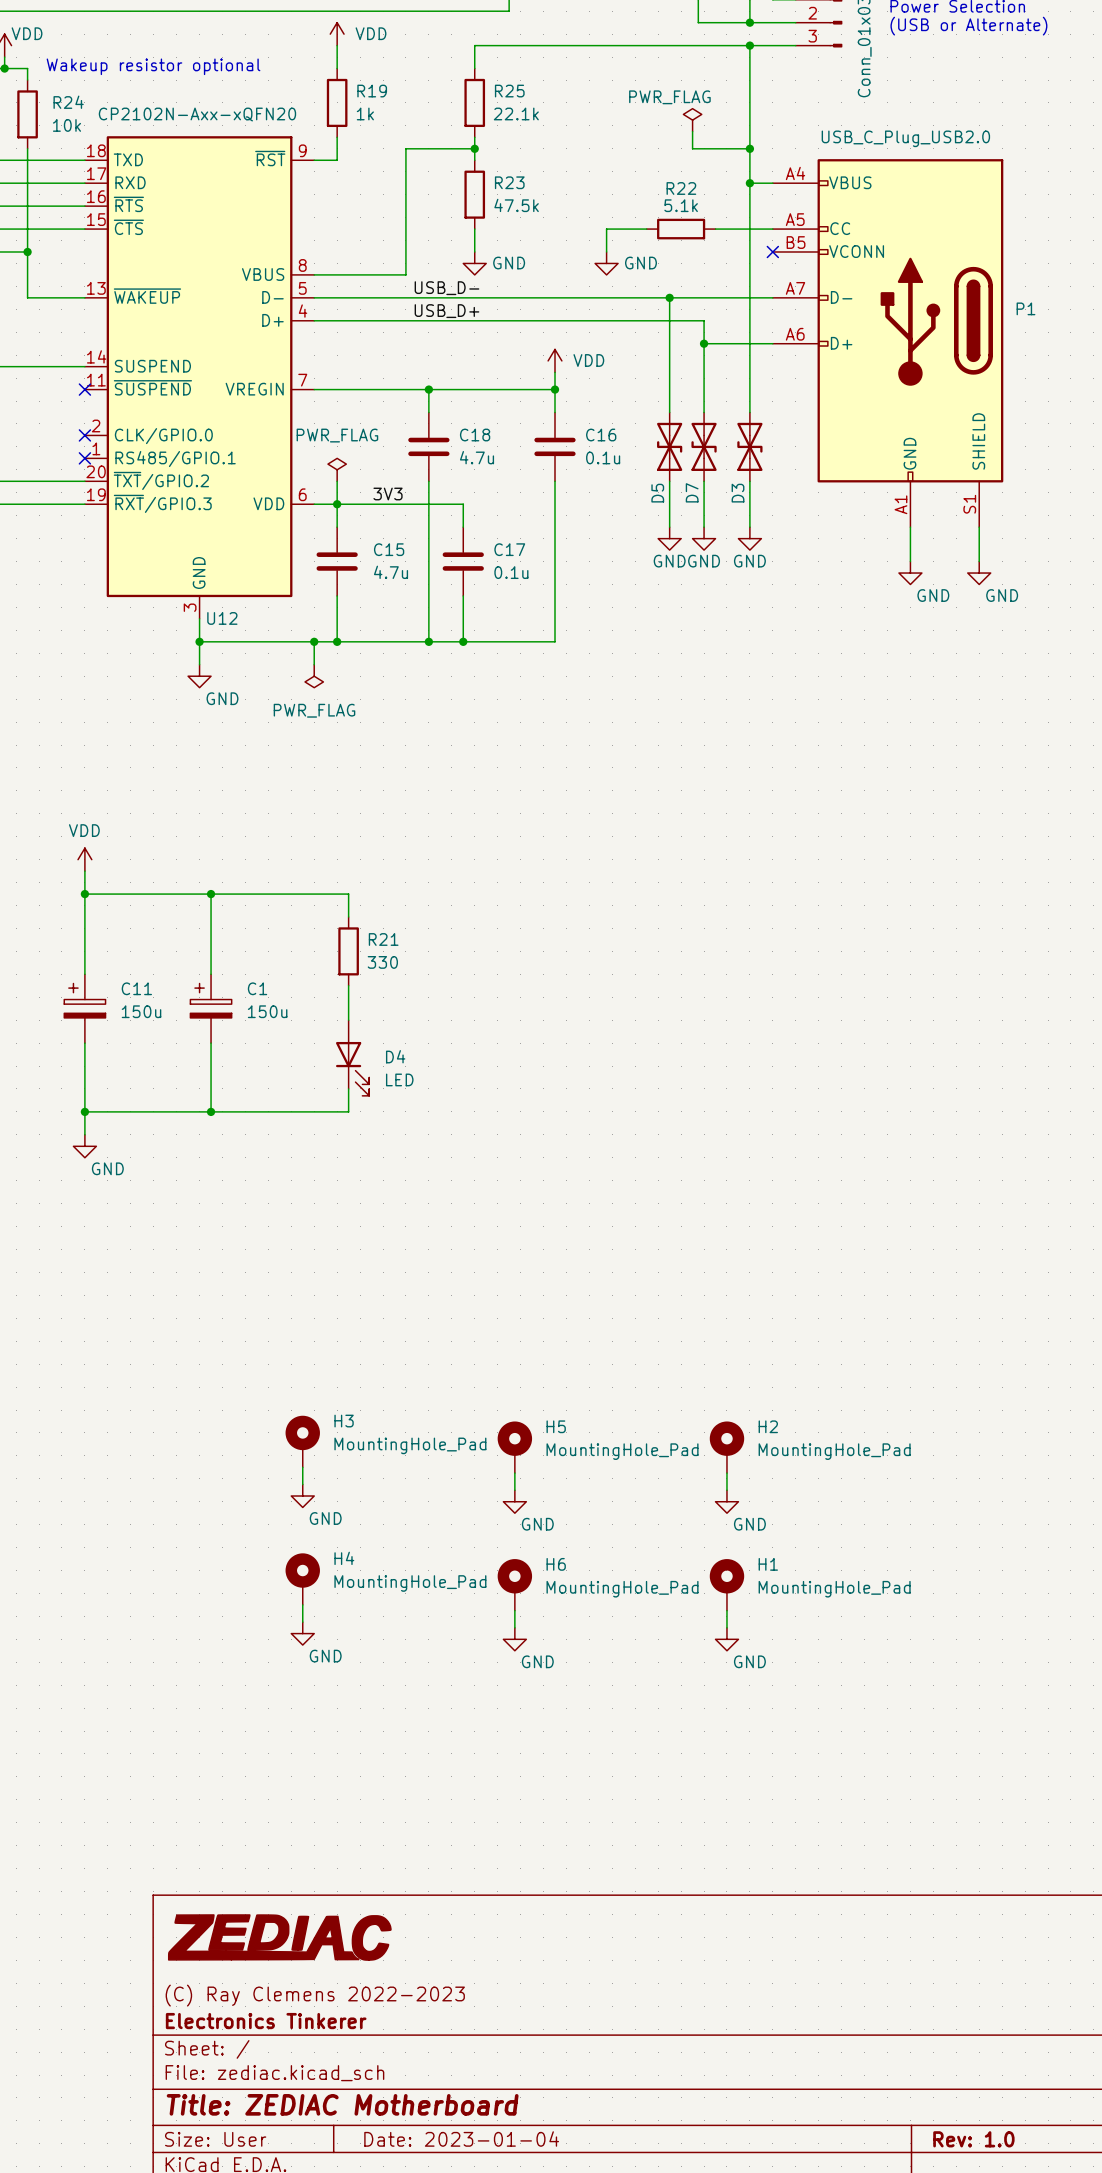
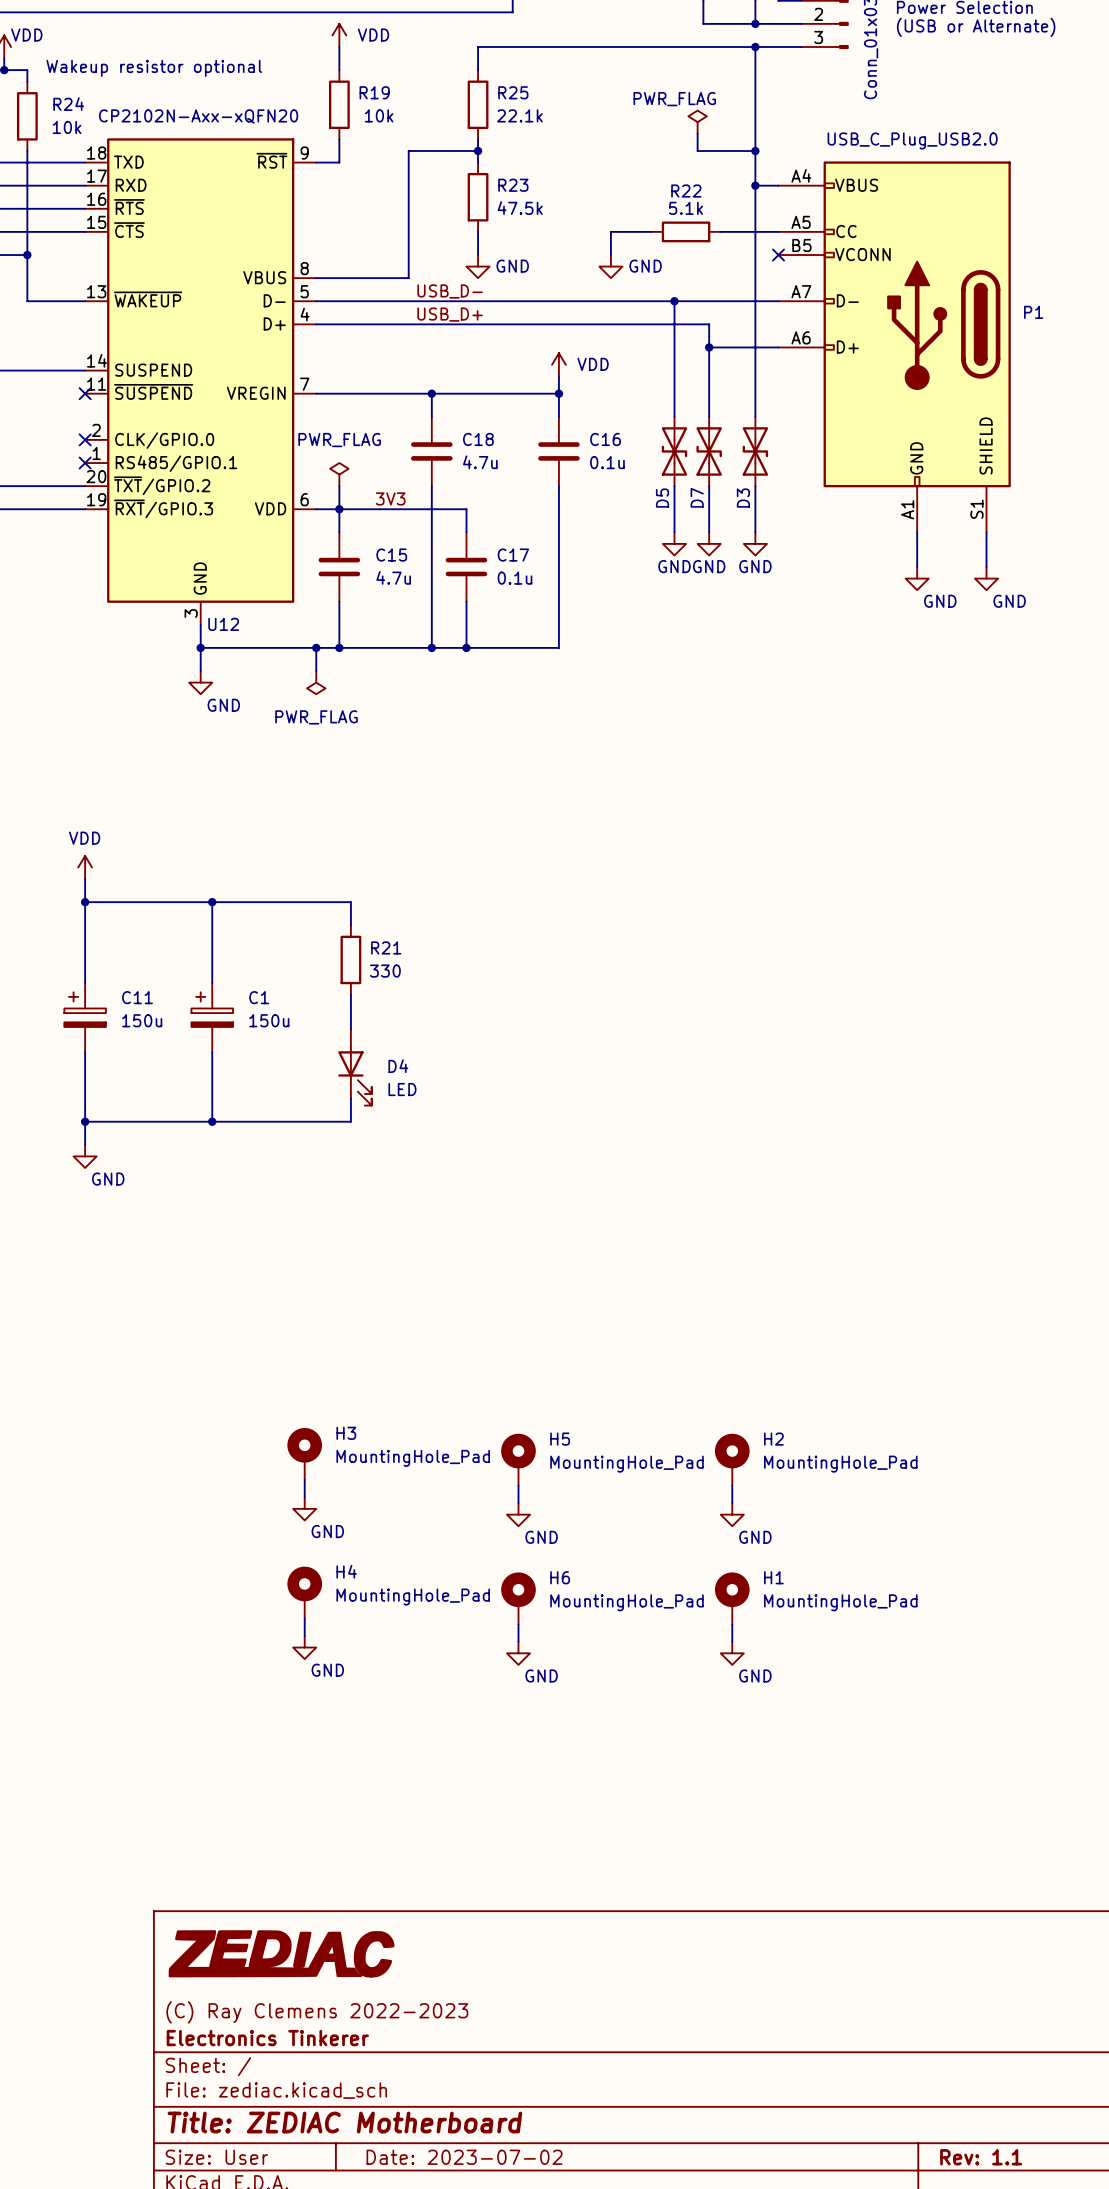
R19 value: 1k (365, 113) -> 10k (379, 115)
title block: Date: 2023-01-04 (461, 2139) -> Date: 2023-07-02 (464, 2157)
title block: Rev: 1.0 (973, 2139) -> Rev: 1.1 (981, 2157)

